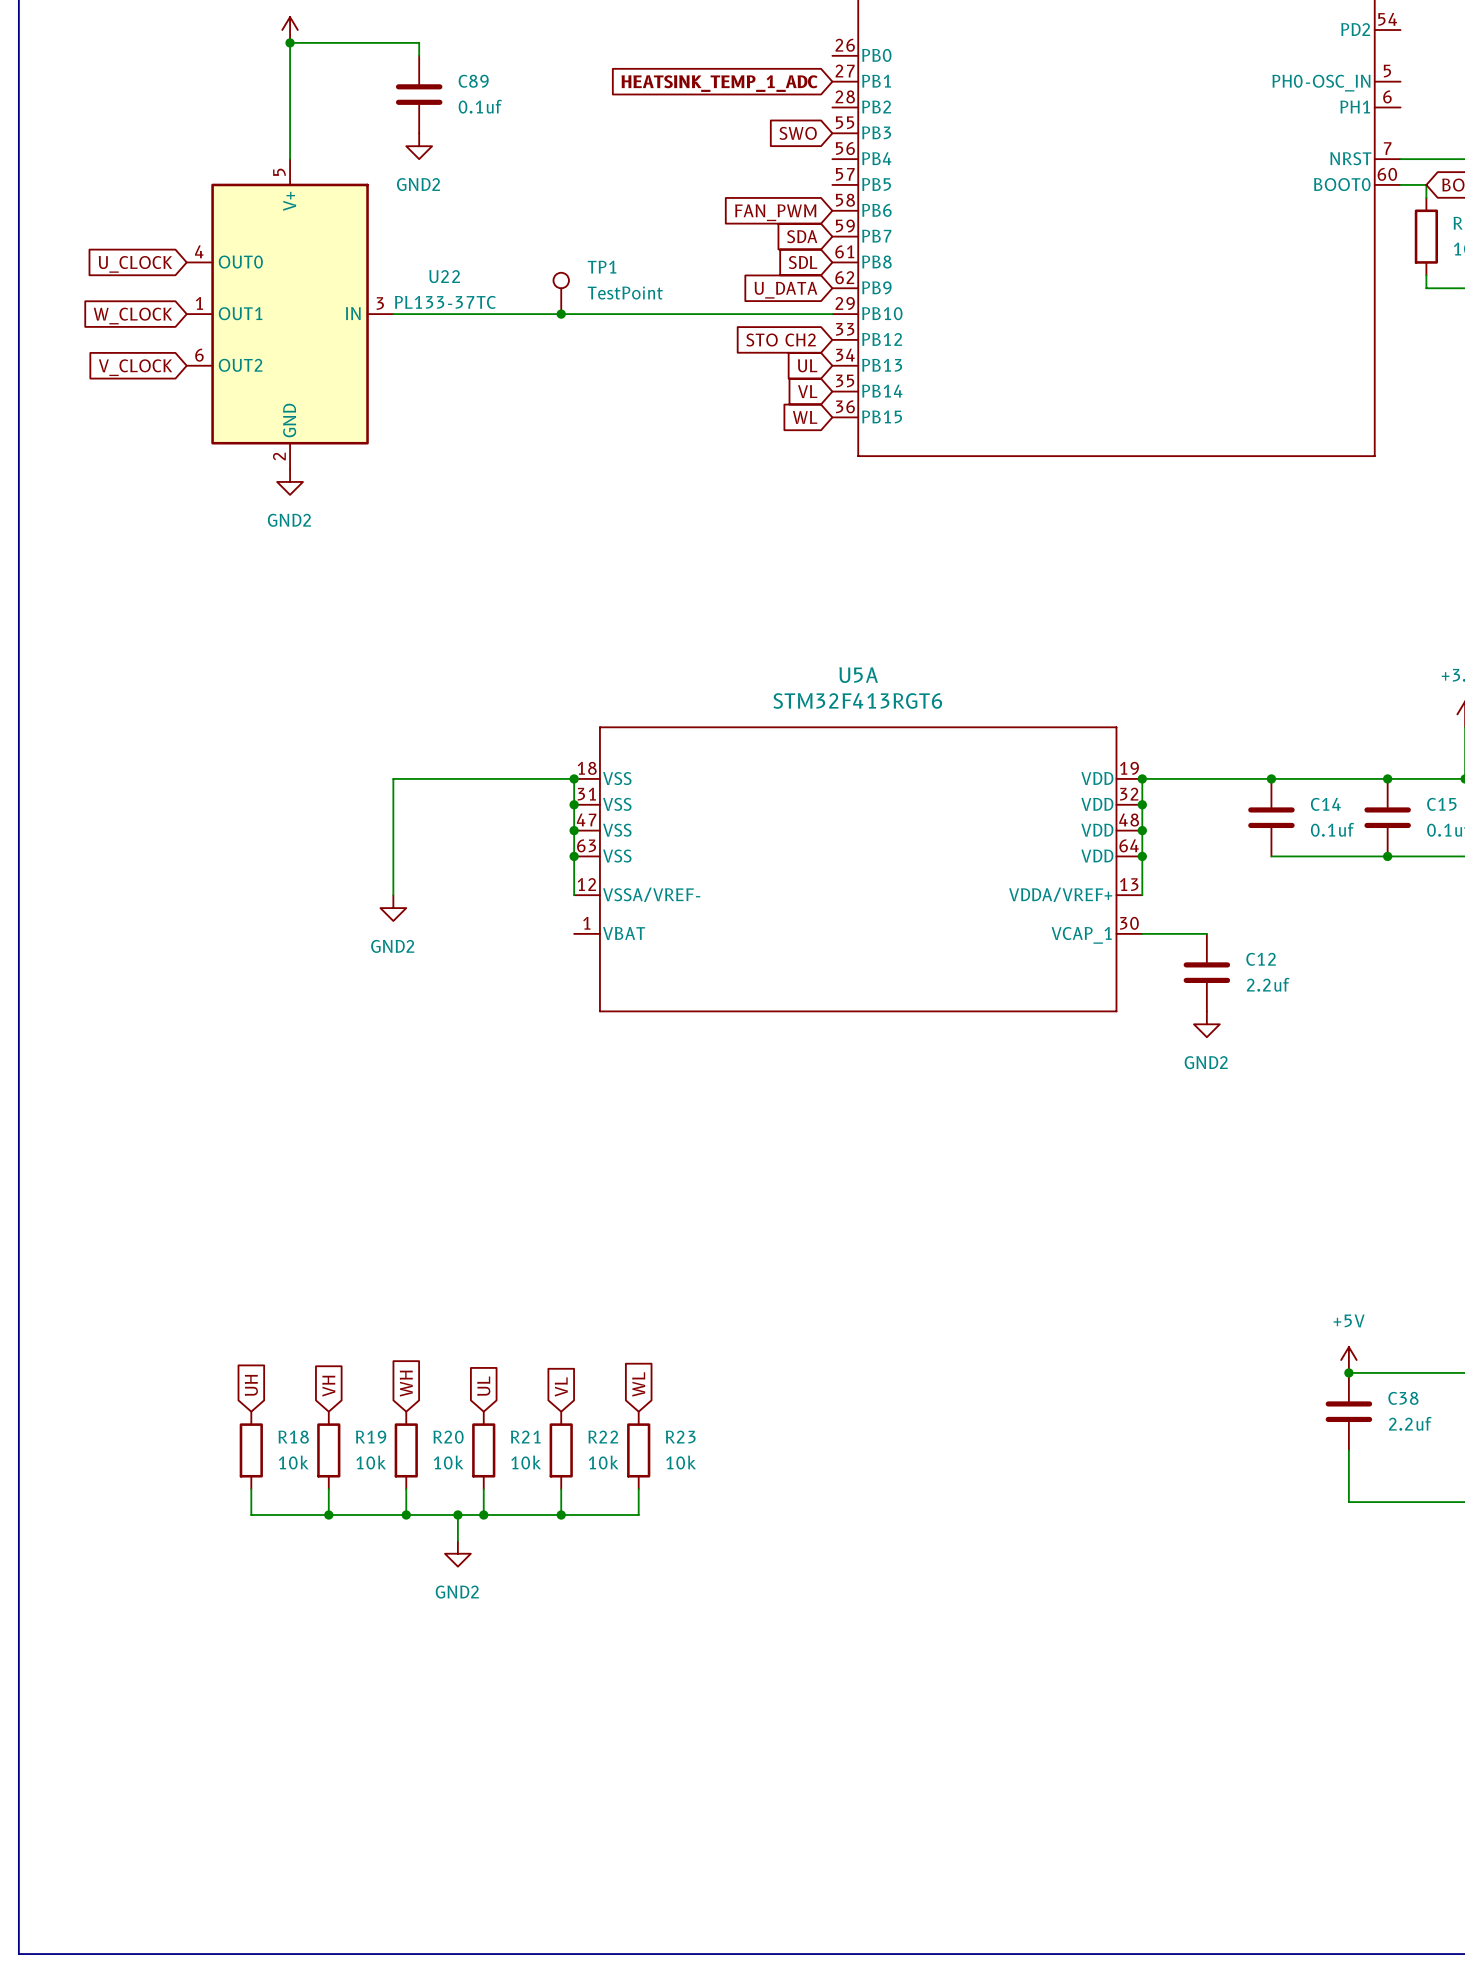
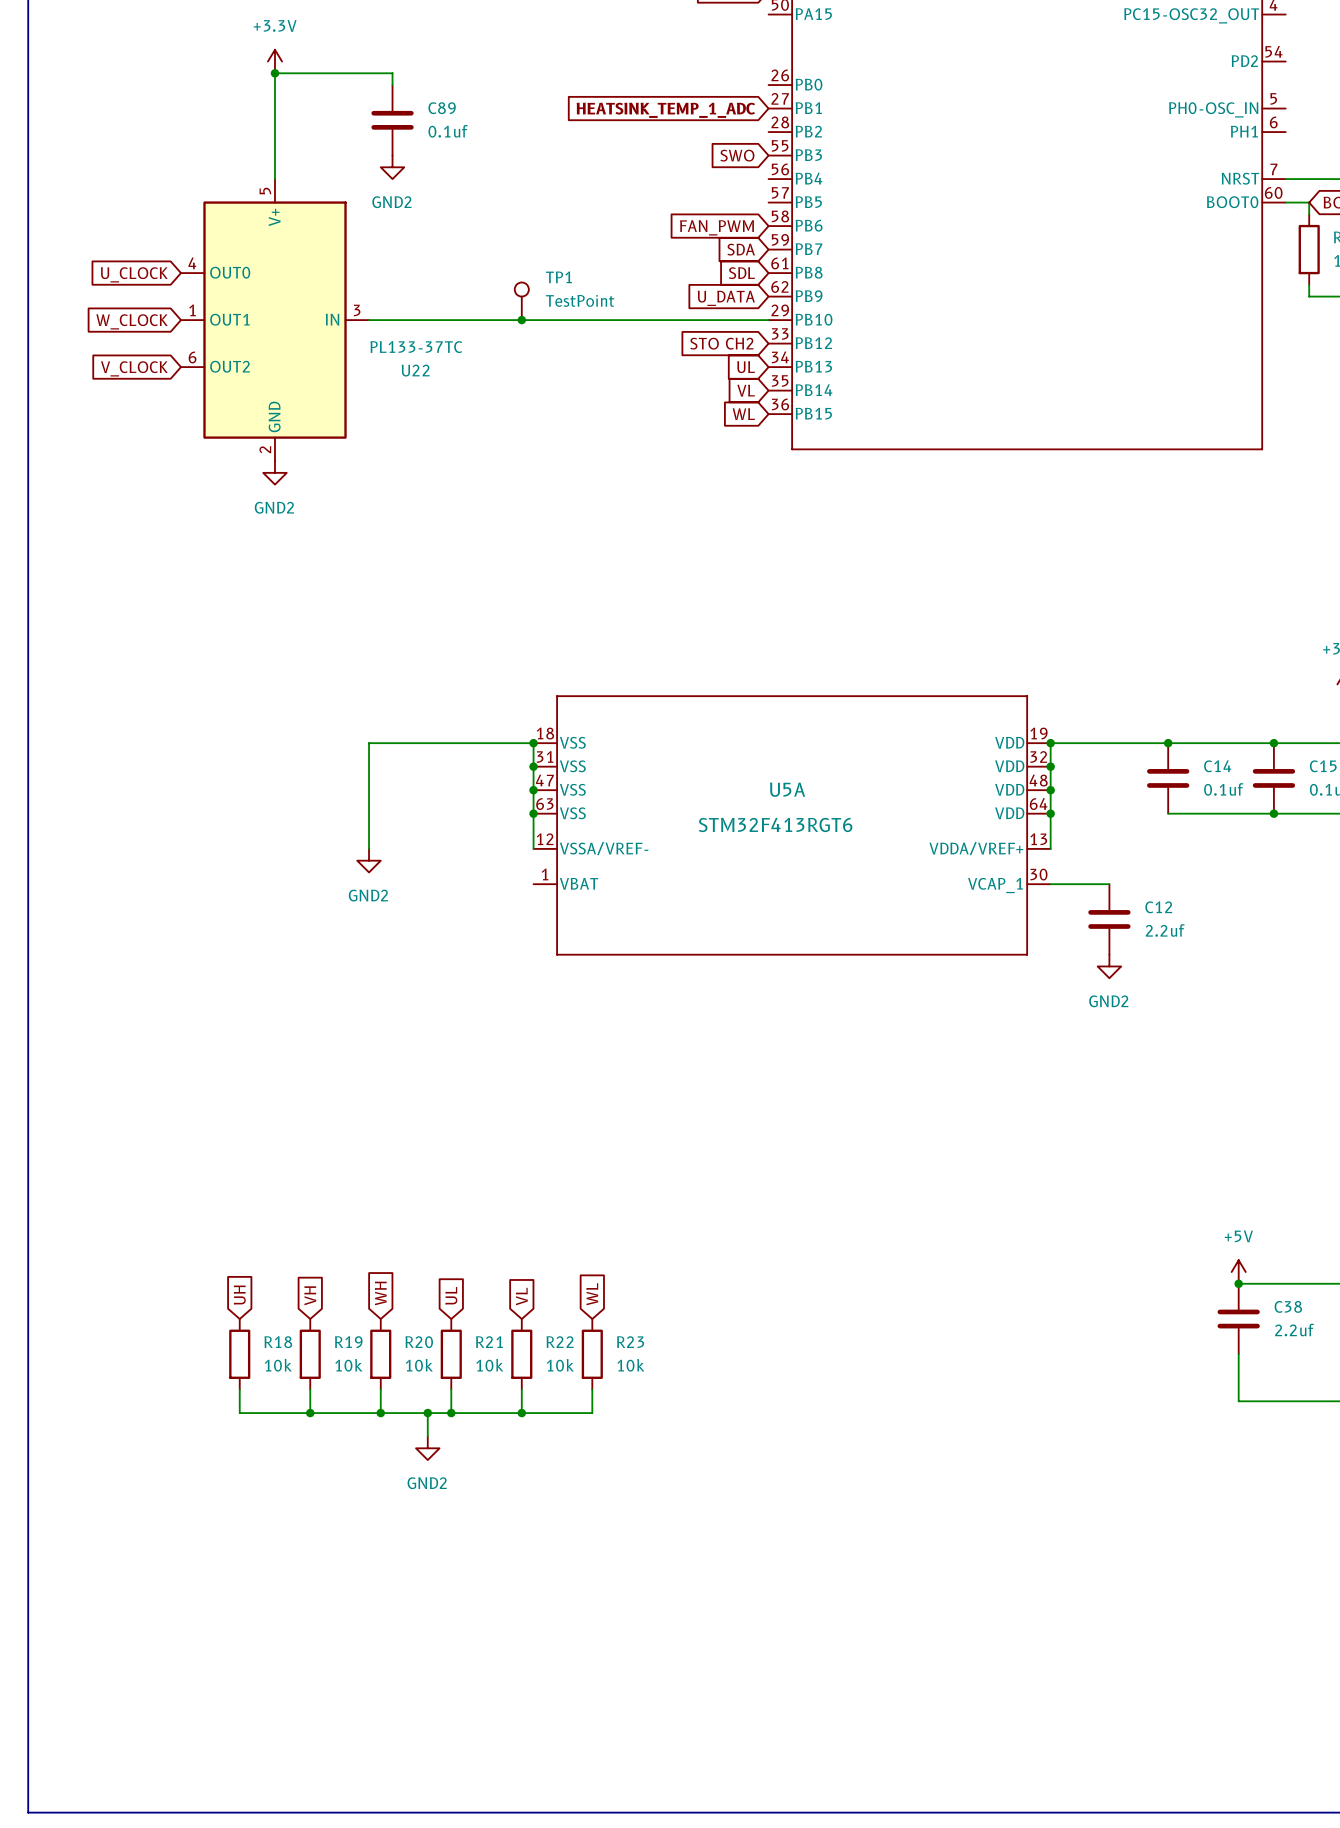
U22 name position: U22 (444, 276) -> U22 (415, 370)
U22 value position: PL133-37TC (445, 302) -> PL133-37TC (416, 347)
U5A name position: U5A (858, 675) -> U5A (787, 789)
U5A value position: STM32F413RGT6 (857, 700) -> STM32F413RGT6 (775, 824)

